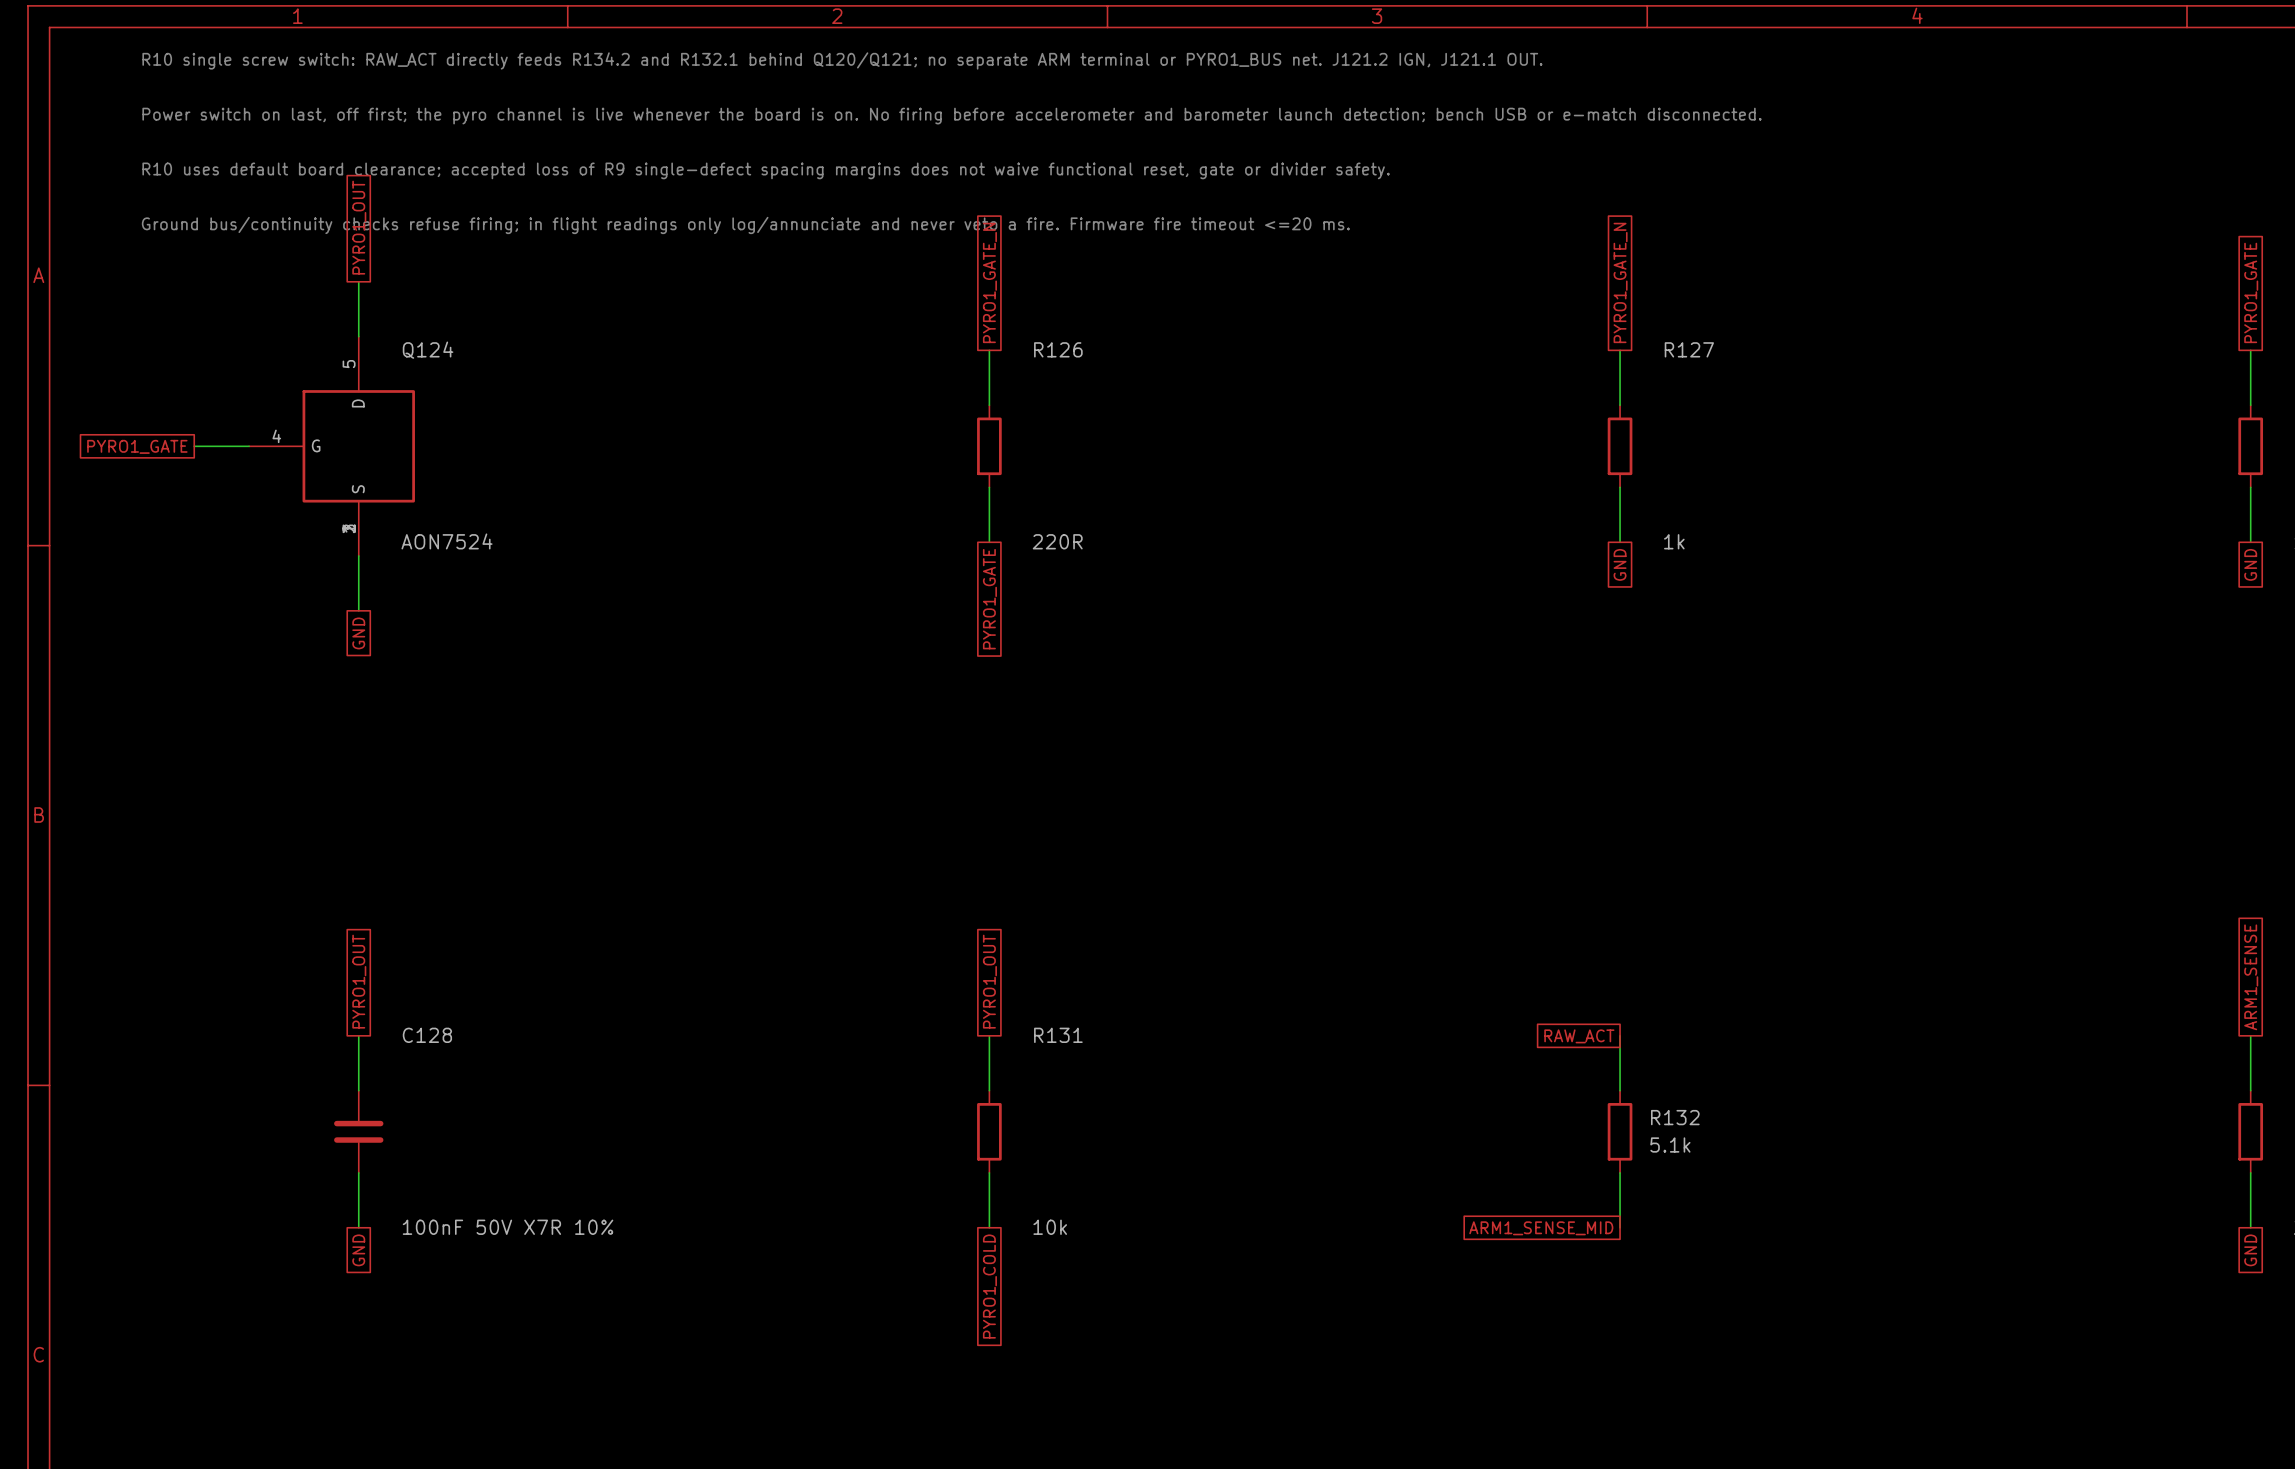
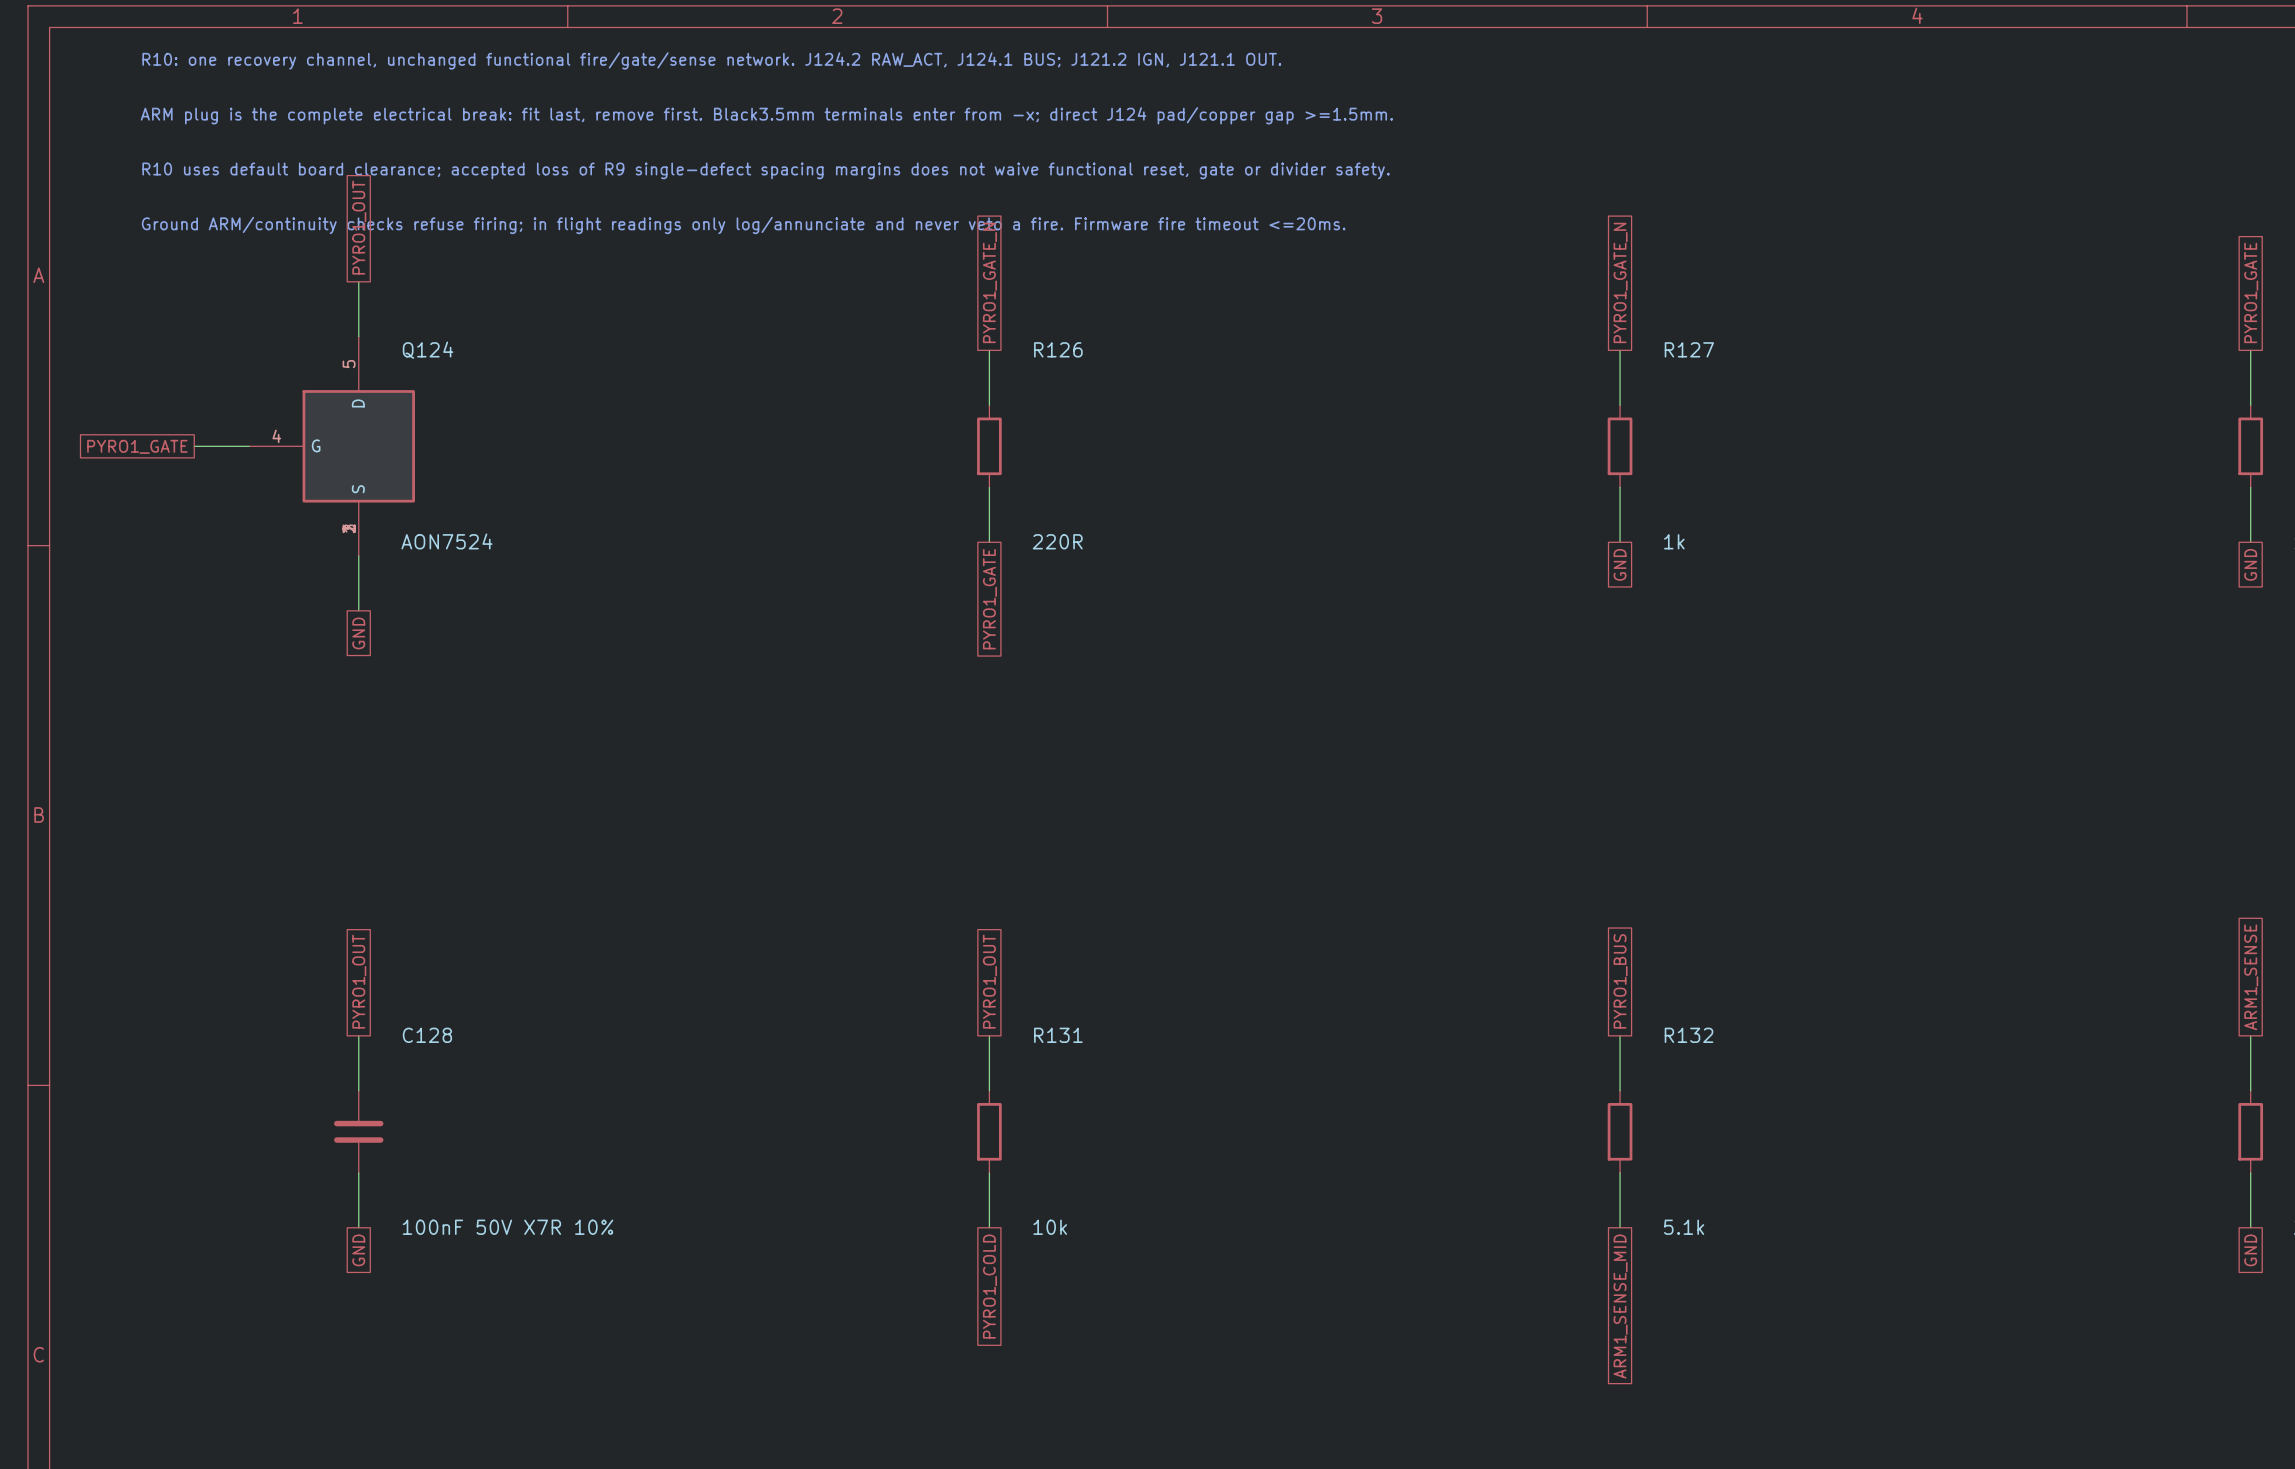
text: R10 single screw switch: RAW_ACT directly feeds R134.2 and R132.1 behind Q120/Q121; no separate ARM terminal or PYRO1_BUS net. J121.2 IGN, J121.1 OUT. (842, 60) -> R10: one recovery channel, unchanged functional fire/gate/sense network. J124.2 RAW_ACT, J124.1 BUS; J121.2 IGN, J121.1 OUT. (711, 60)
text: Power switch on last, off first; the pyro channel is live whenever the board is on. No firing before accelerometer and barometer launch detection; bench USB or e-match disconnected. (952, 116) -> ARM plug is the complete electrical break: fit last, remove first. Black3.5mm terminals enter from -x; direct J124 pad/copper gap >=1.5mm. (766, 115)
text: Ground bus/continuity checks refuse firing; in flight readings only log/annunciate and never veto a fire. Firmware fire timeout <=20 ms. (745, 225) -> Ground ARM/continuity checks refuse firing; in flight readings only log/annunciate and never veto a fire. Firmware fire timeout <=20ms. (743, 225)
global label: RAW_ACT (1579, 1036) -> PYRO1_BUS (1620, 981)
R132 name position: R132 (1675, 1117) -> R132 (1689, 1035)
R132 value position: 5.1k (1670, 1145) -> 5.1k (1684, 1227)
global label rotation: 0° (1541, 1228) -> 90° counterclockwise (1620, 1306)

